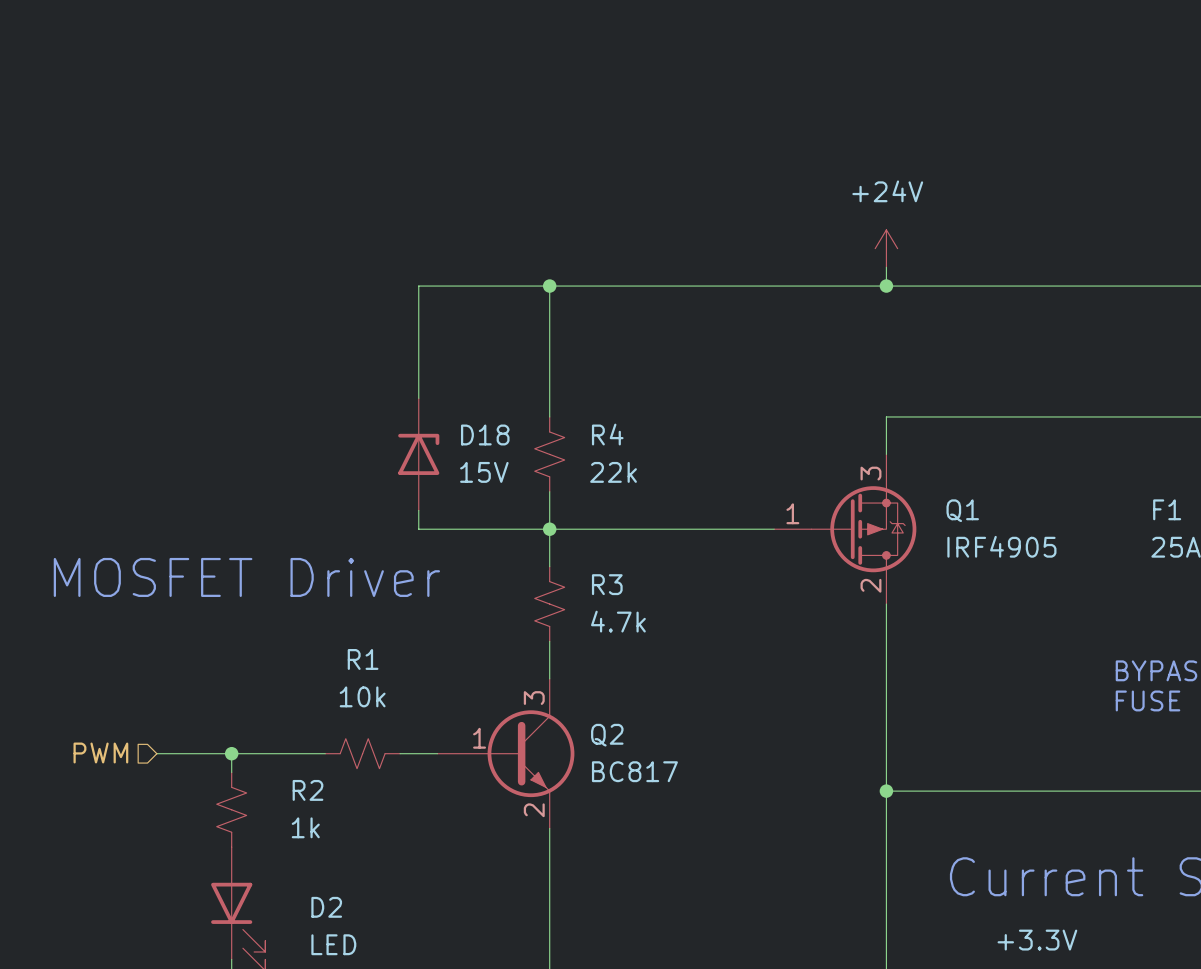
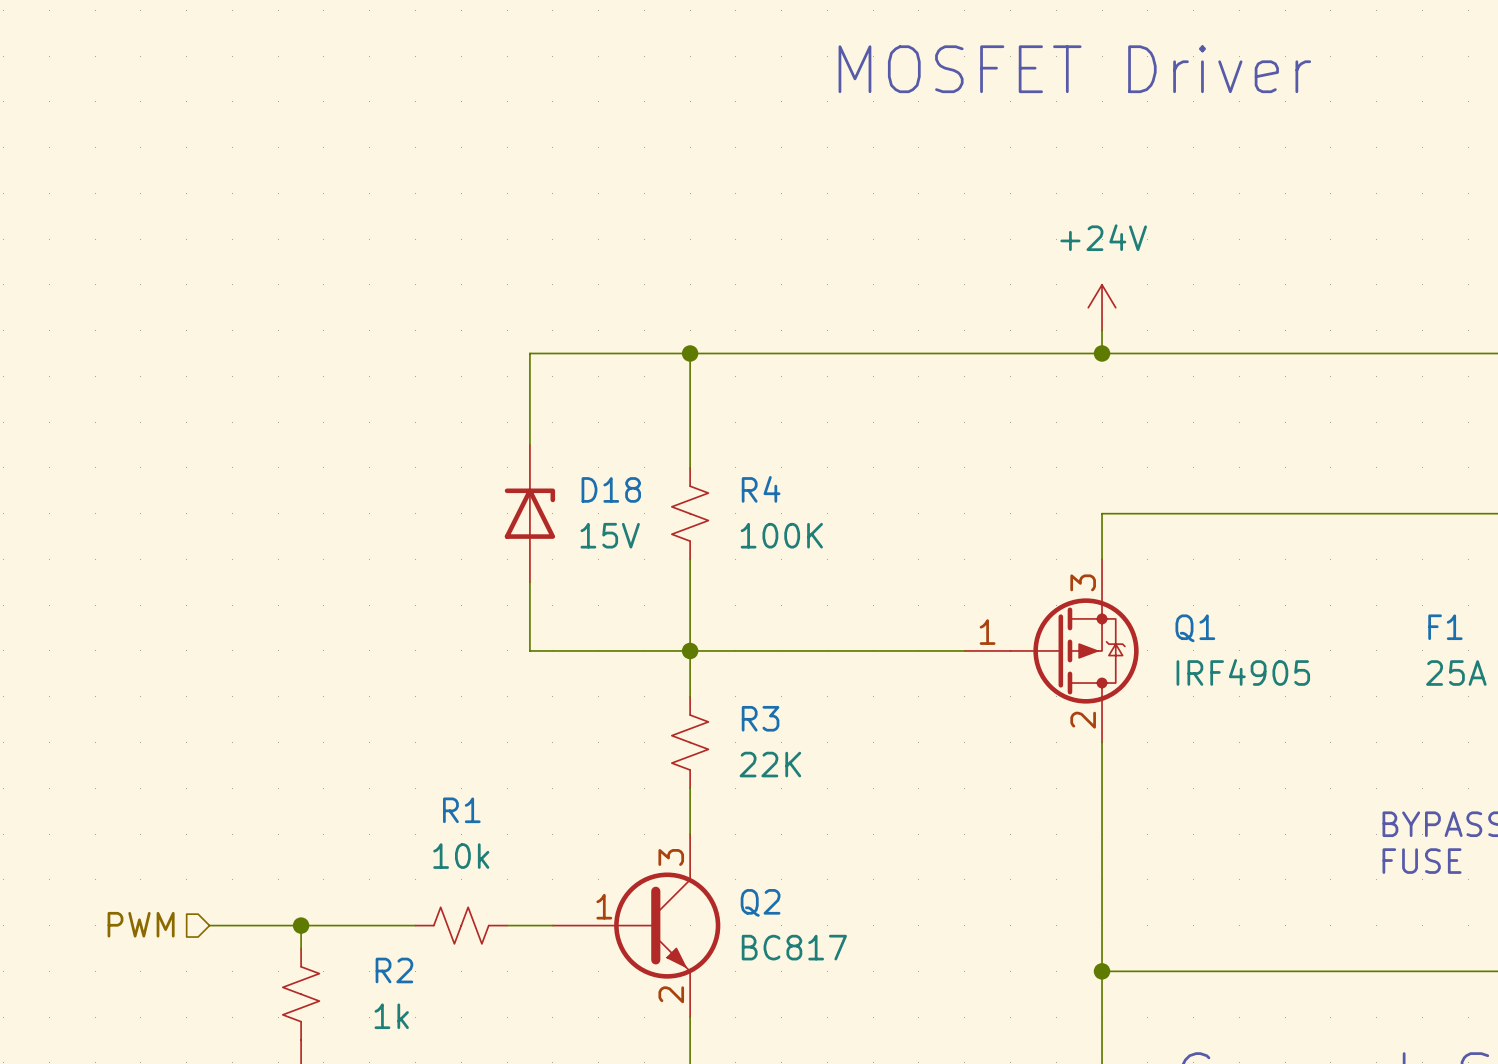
text: none -> MOSFET Driver (1074, 69)
wire: (549, 379) (549, 416) -> (690, 559) (690, 605)
D18 position: (418, 454) -> (529, 513)
R4 position: (549, 454) -> (690, 513)
R4 value: 22k (613, 472) -> 100K (781, 535)
text: MOSFET Driver (246, 577) -> none
R3 value: 4.7k (618, 621) -> 22K (770, 764)

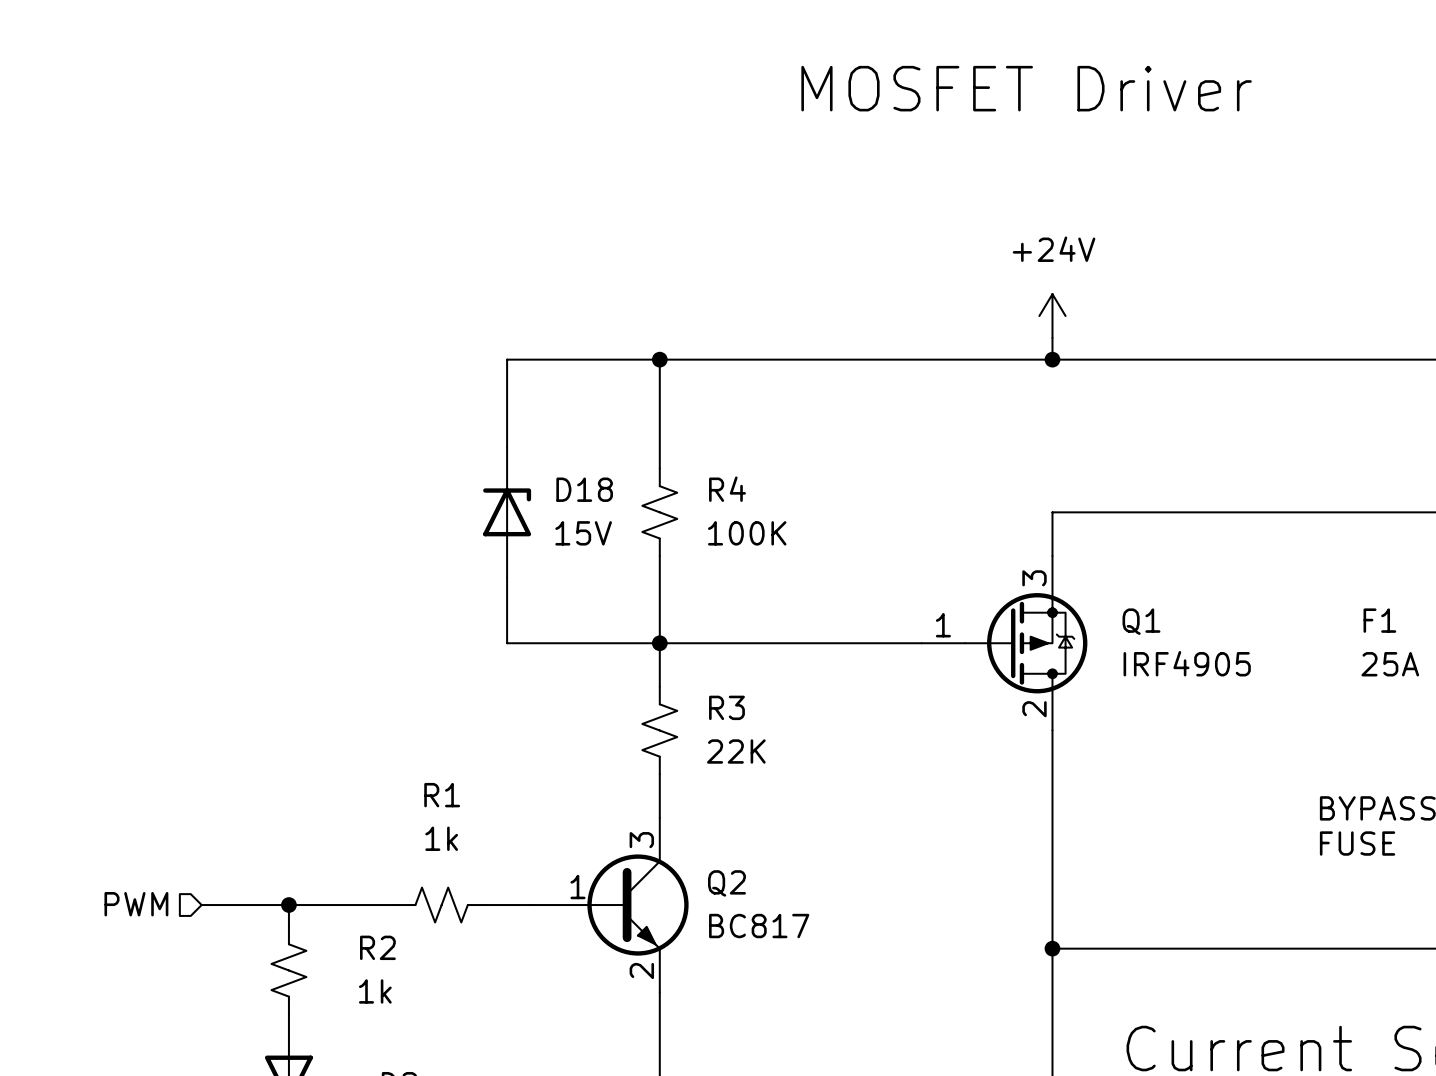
R1 value: 10k (461, 856) -> 1k (441, 838)

